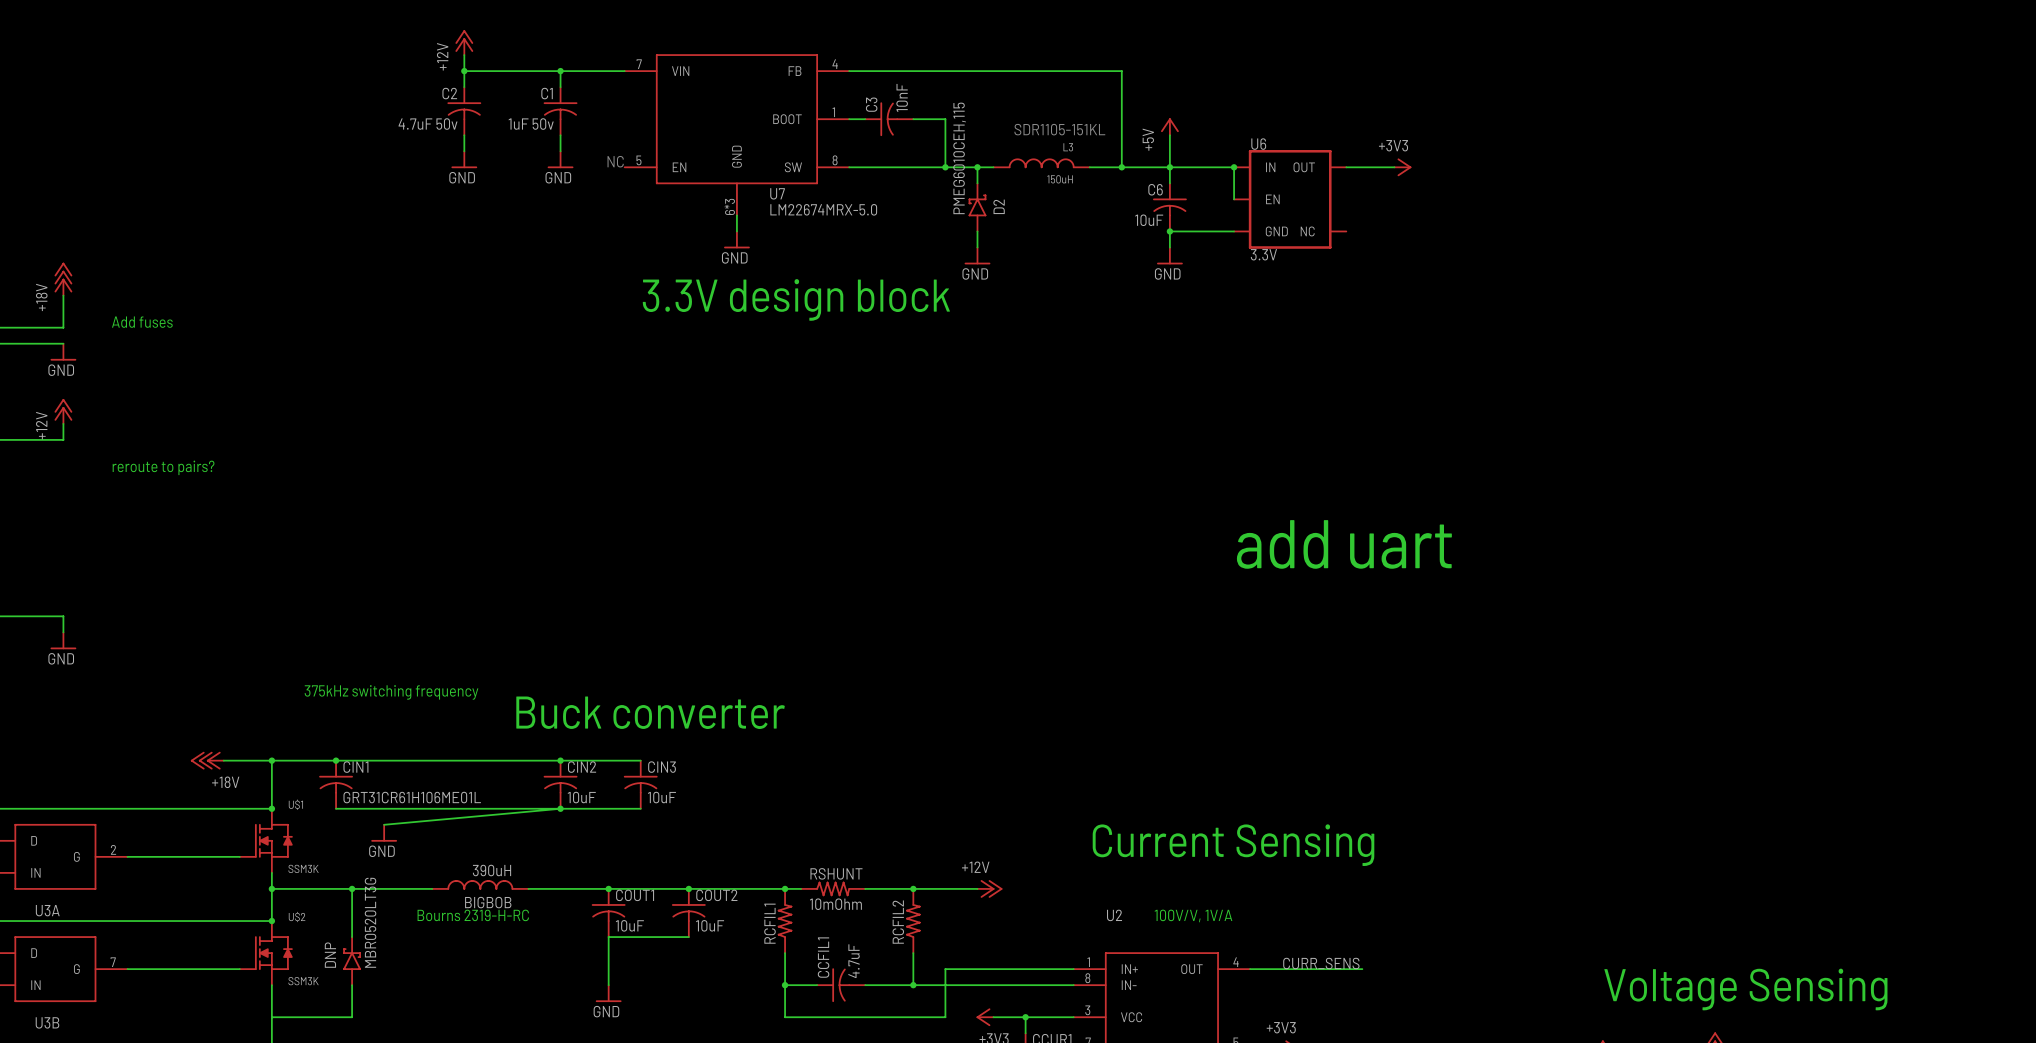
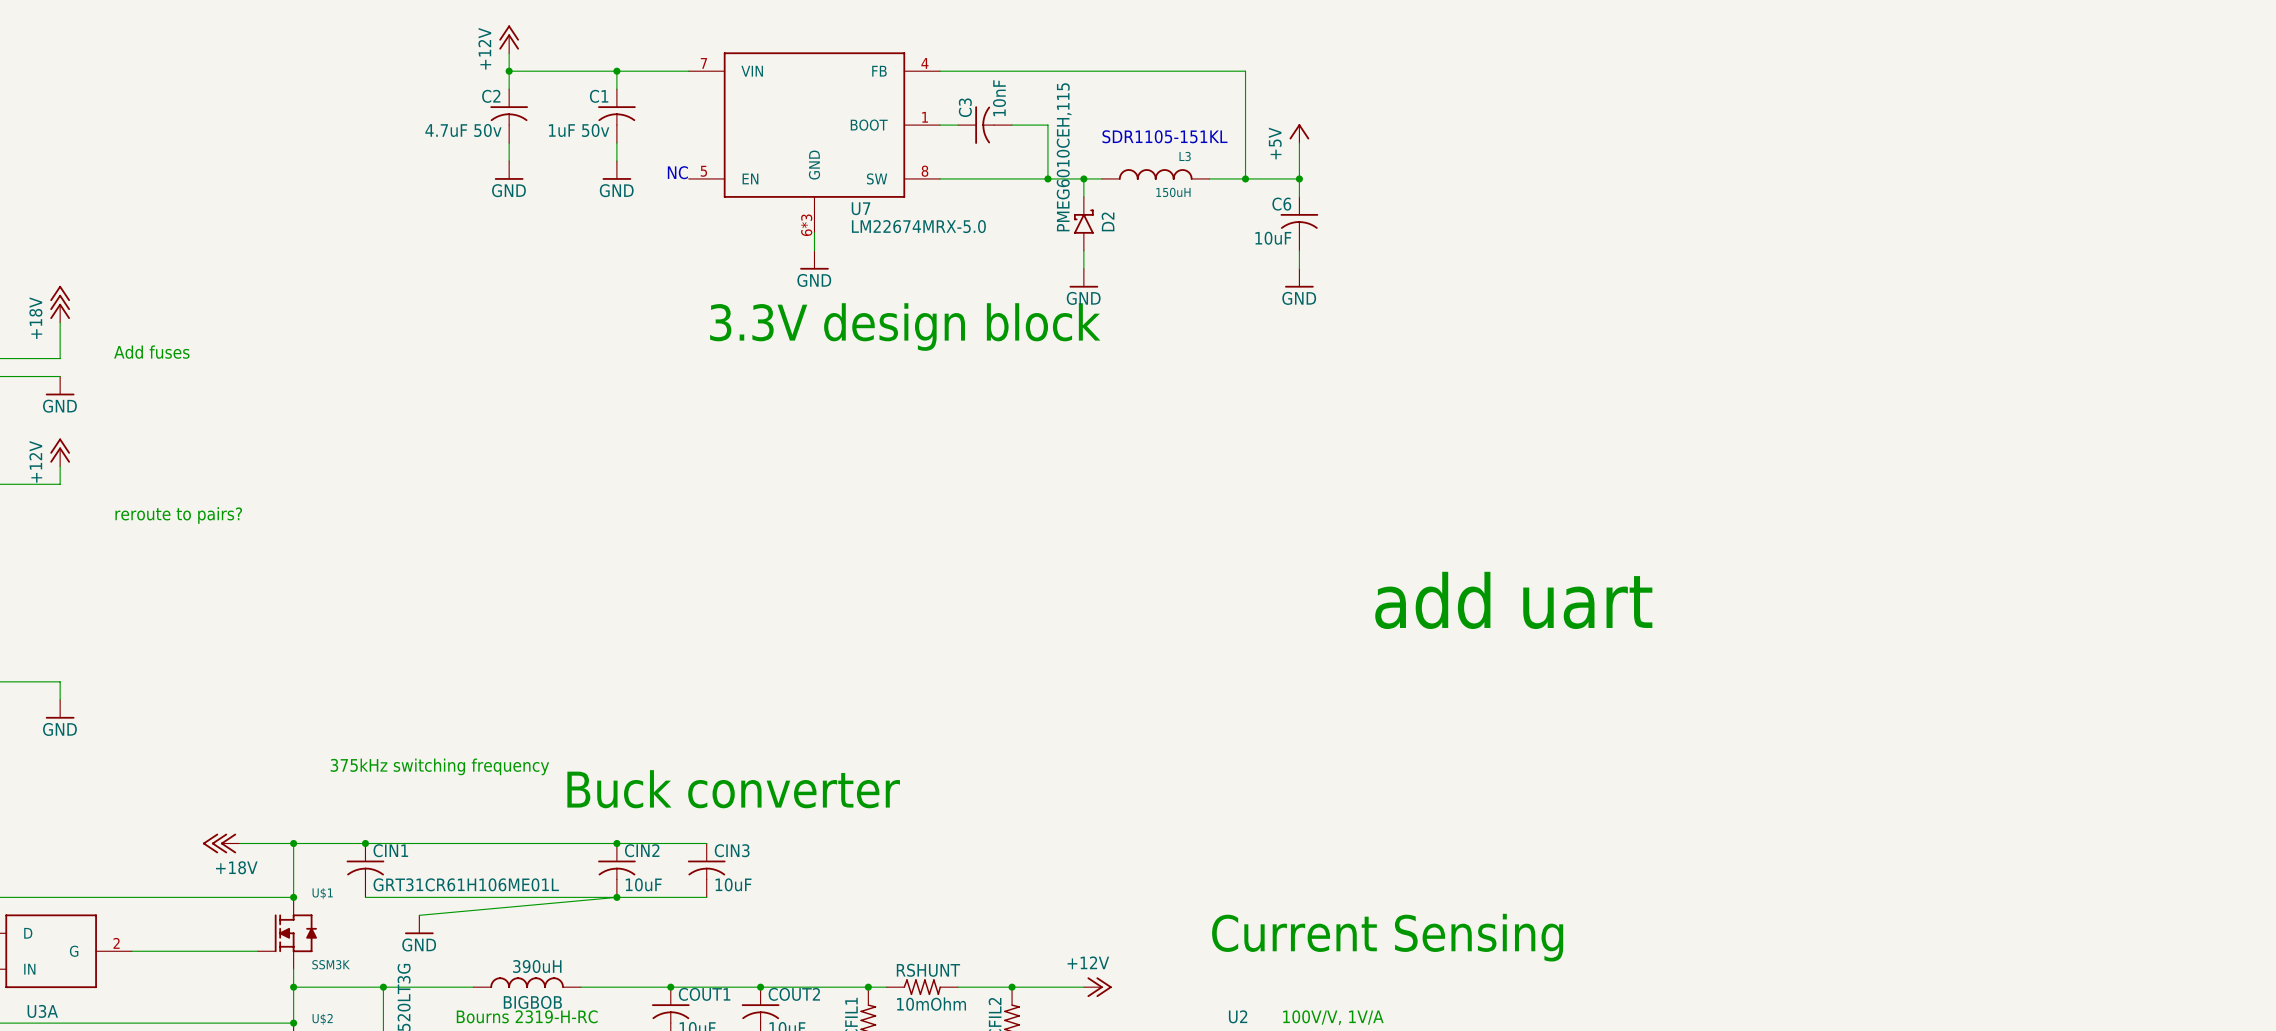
wire: (1169, 167) (1234, 167) (1234, 199) -> none
junction: (1234, 167) -> none
wire: (1346, 167) (1394, 167) -> none
power symbol: +3V3 (1402, 167) -> none
U6: 3.3V (1290, 199) -> none
wire: (1169, 231) (1234, 231) -> none
junction: (1169, 231) -> none

